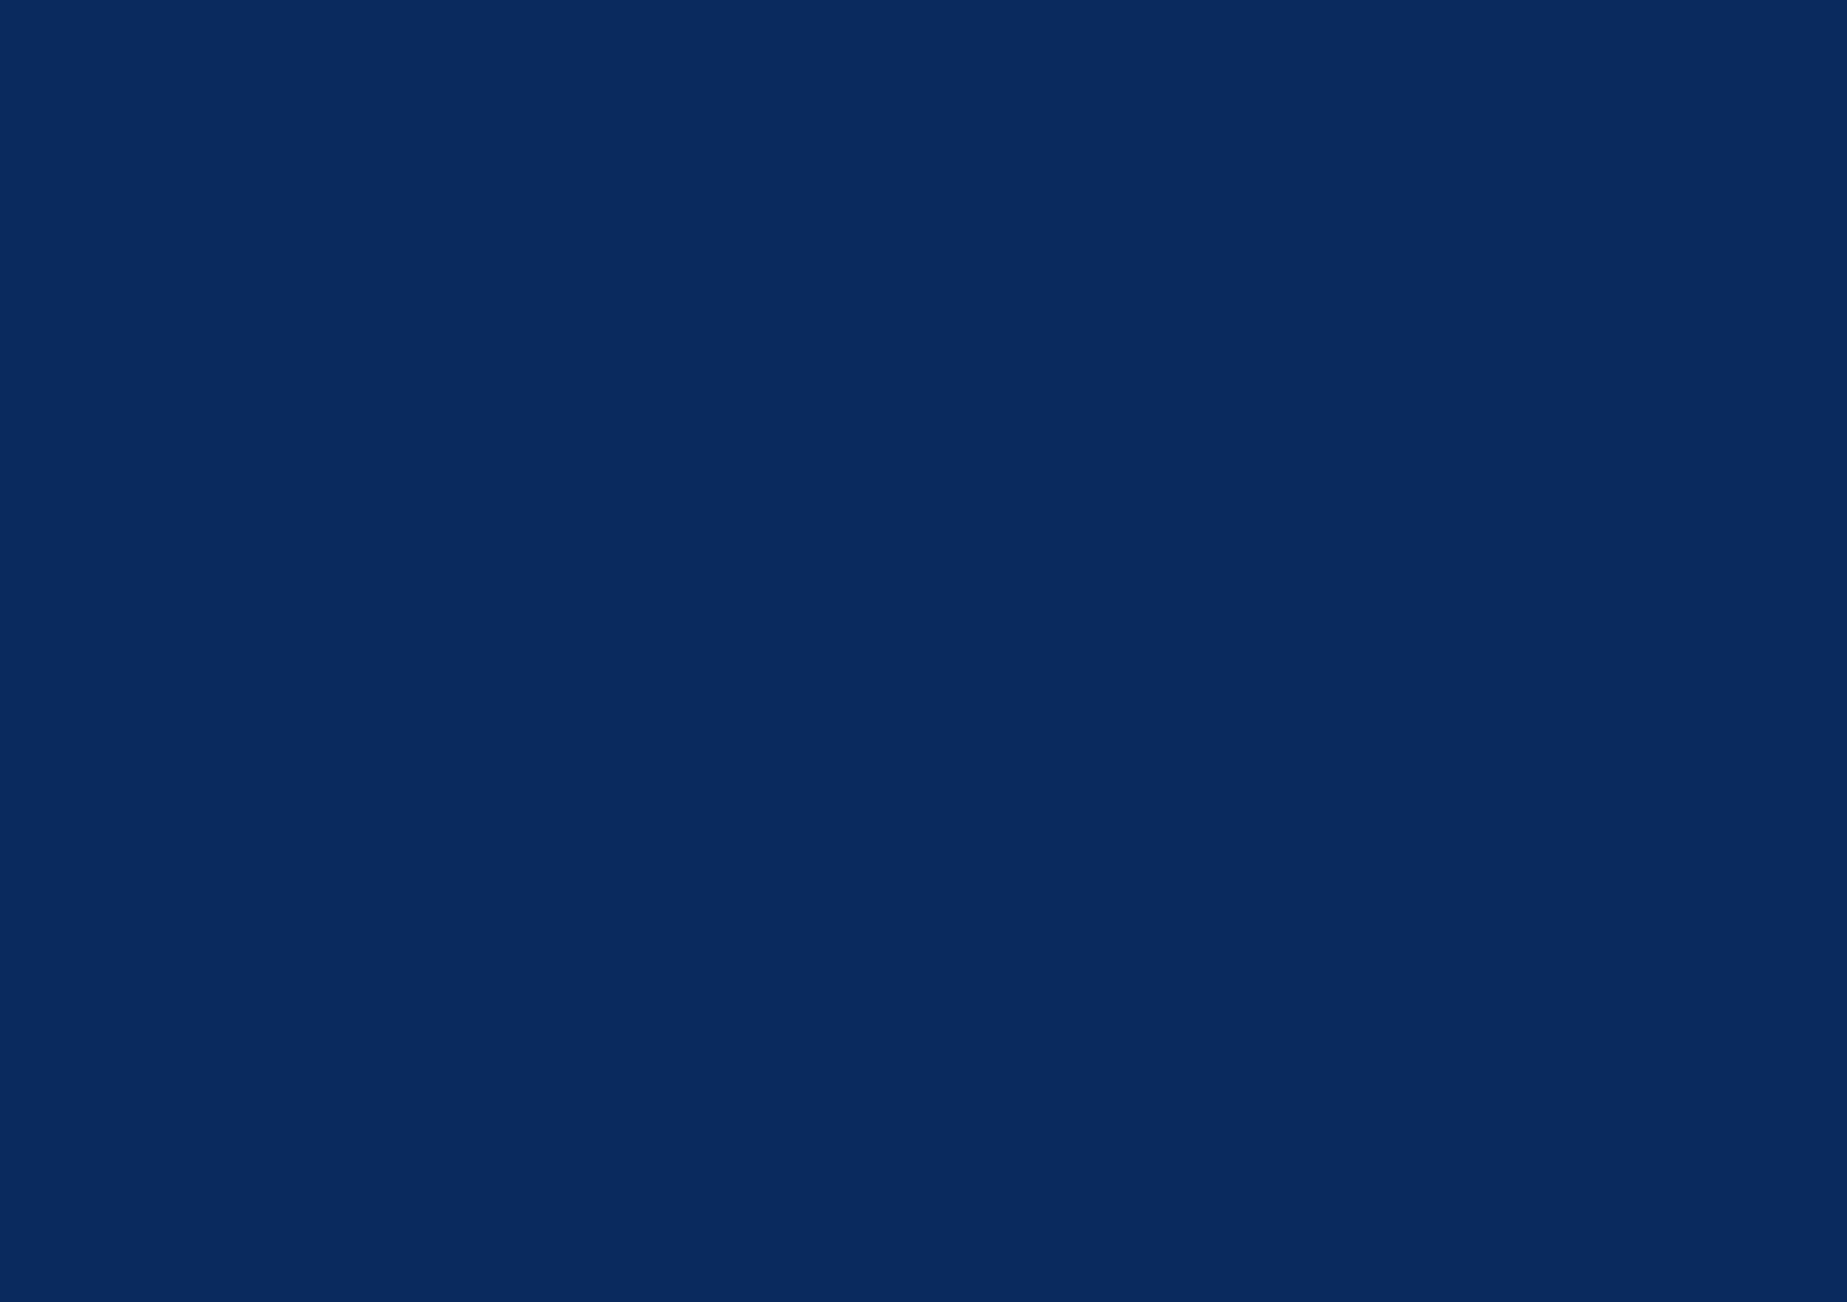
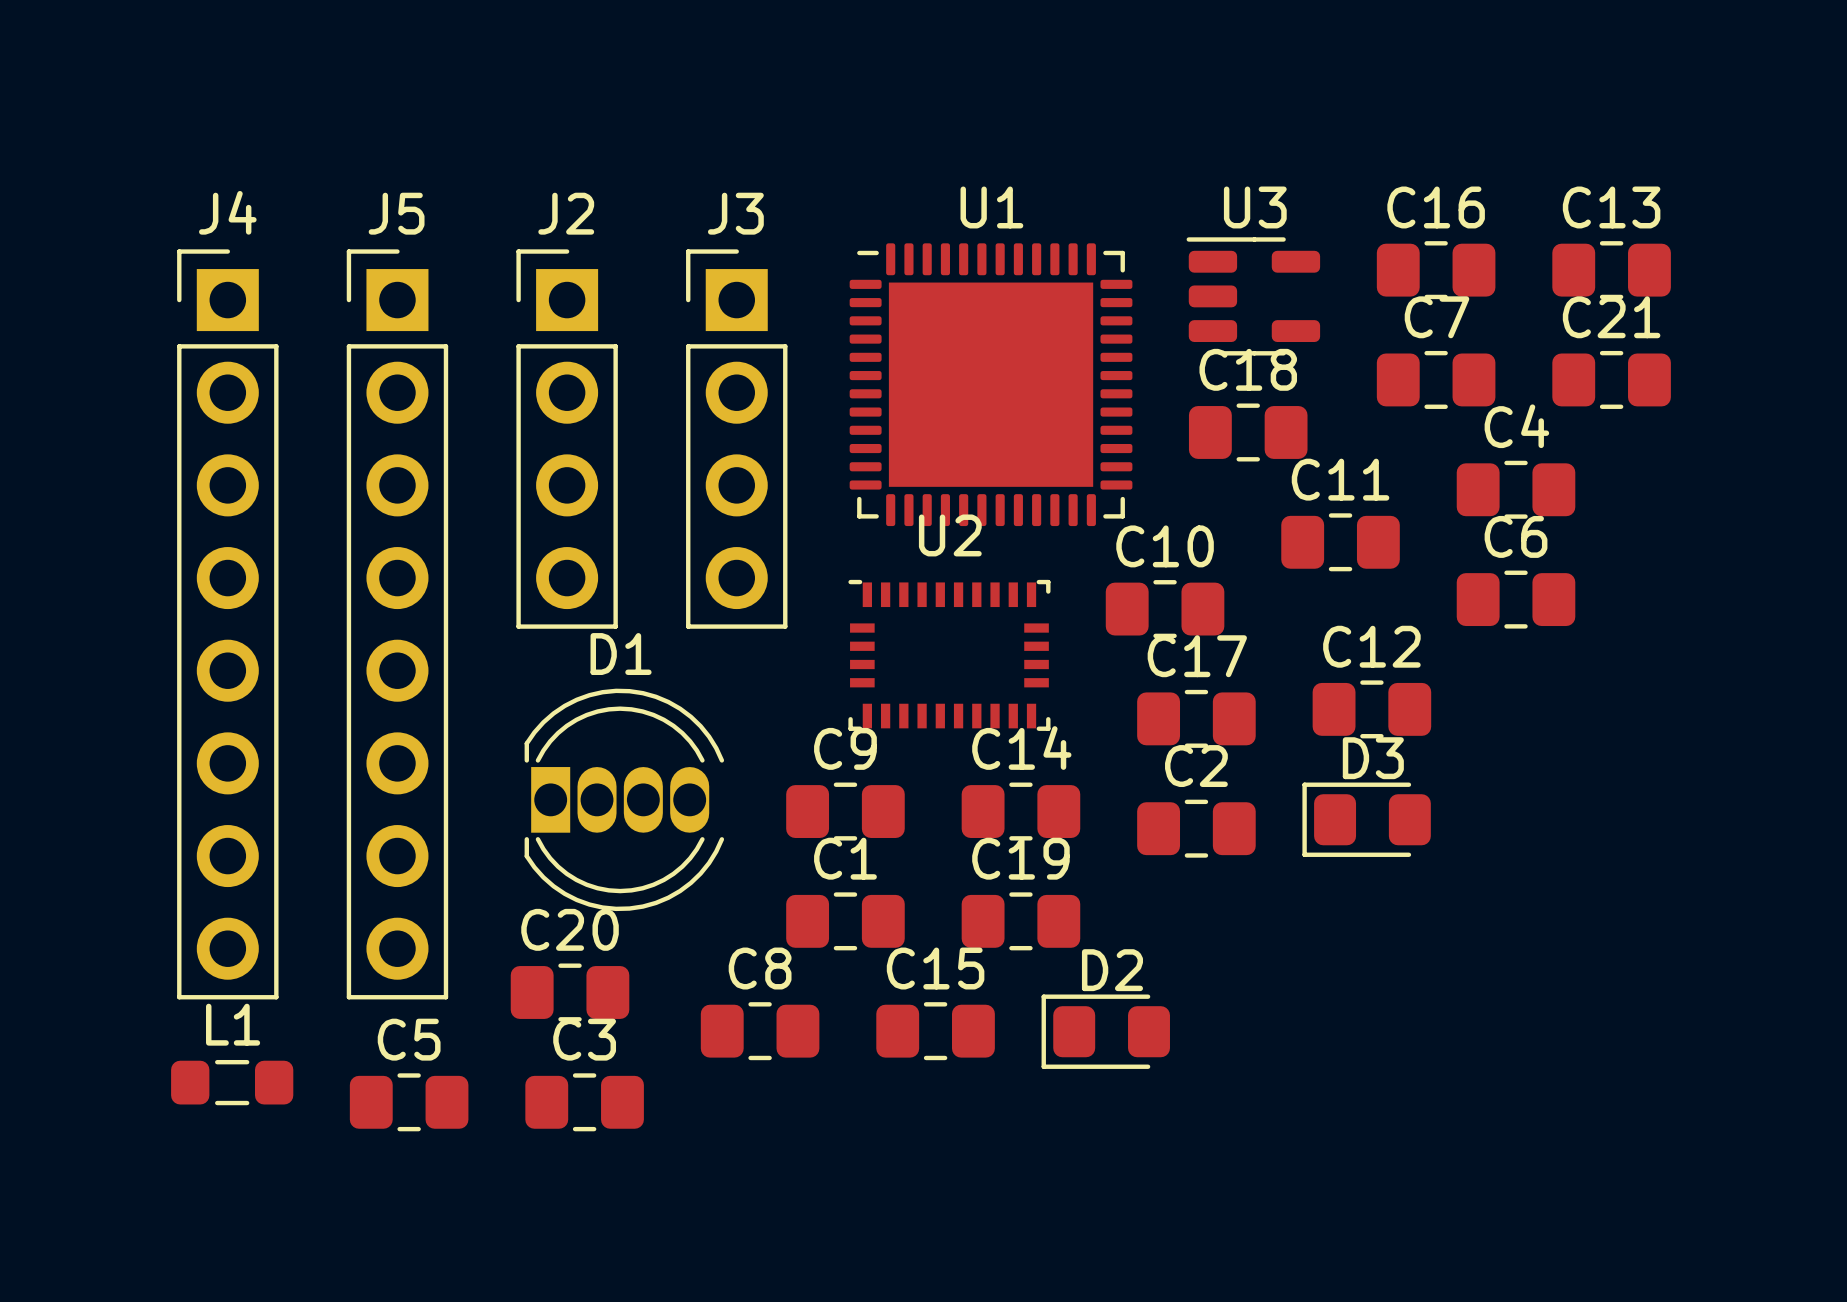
C16: none -> (1436, 270)
C13: none -> (1611, 270)
U3: none -> (1253, 296)
C7: none -> (1436, 379)
C21: none -> (1611, 379)
U1: none -> (991, 384)
C18: none -> (1248, 432)
J2: none -> (567, 439)
J3: none -> (736, 439)
C4: none -> (1516, 489)
C11: none -> (1340, 542)
C6: none -> (1516, 599)
C10: none -> (1165, 609)
J4: none -> (227, 624)
J5: none -> (397, 624)
U2: none -> (949, 655)
C12: none -> (1371, 709)
C17: none -> (1196, 718)
D1: none -> (624, 799)
C9: none -> (845, 811)
C14: none -> (1020, 811)
D3: none -> (1366, 819)
C2: none -> (1196, 828)
C1: none -> (845, 921)
C19: none -> (1020, 921)
C20: none -> (570, 992)
C8: none -> (760, 1031)
C15: none -> (935, 1031)
D2: none -> (1105, 1031)
L1: none -> (232, 1082)
C5: none -> (409, 1102)
C3: none -> (584, 1102)

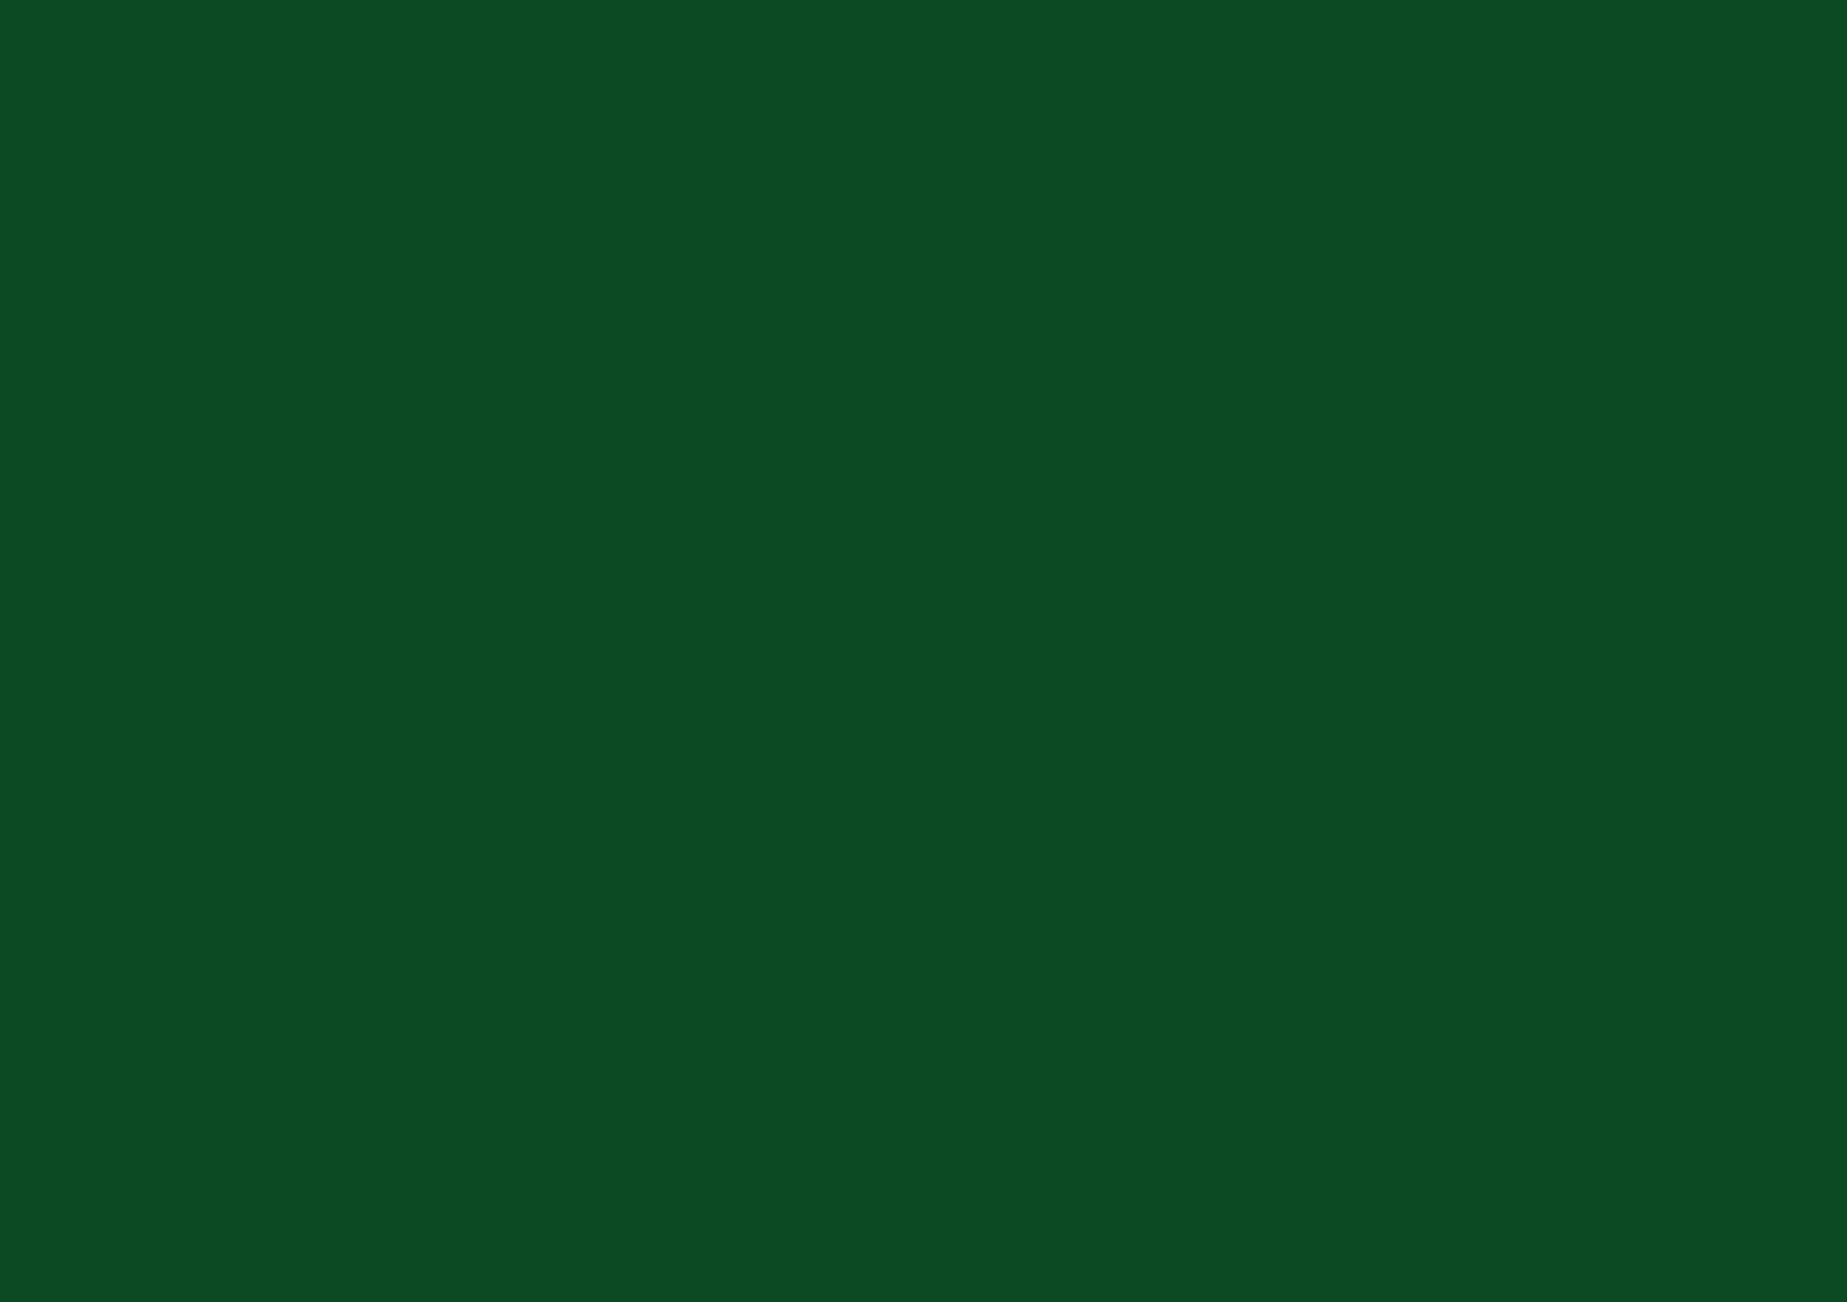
C16: (1436, 270) -> none
C13: (1611, 270) -> none
U3: (1253, 296) -> none
C7: (1436, 379) -> none
C21: (1611, 379) -> none
U1: (991, 384) -> none
C18: (1248, 432) -> none
J2: (567, 439) -> none
J3: (736, 439) -> none
C4: (1516, 489) -> none
C11: (1340, 542) -> none
C6: (1516, 599) -> none
C10: (1165, 609) -> none
J4: (227, 624) -> none
J5: (397, 624) -> none
U2: (949, 655) -> none
C12: (1371, 709) -> none
C17: (1196, 718) -> none
D1: (624, 799) -> none
C9: (845, 811) -> none
C14: (1020, 811) -> none
D3: (1366, 819) -> none
C2: (1196, 828) -> none
C1: (845, 921) -> none
C19: (1020, 921) -> none
C20: (570, 992) -> none
C8: (760, 1031) -> none
C15: (935, 1031) -> none
D2: (1105, 1031) -> none
L1: (232, 1082) -> none
C5: (409, 1102) -> none
C3: (584, 1102) -> none

